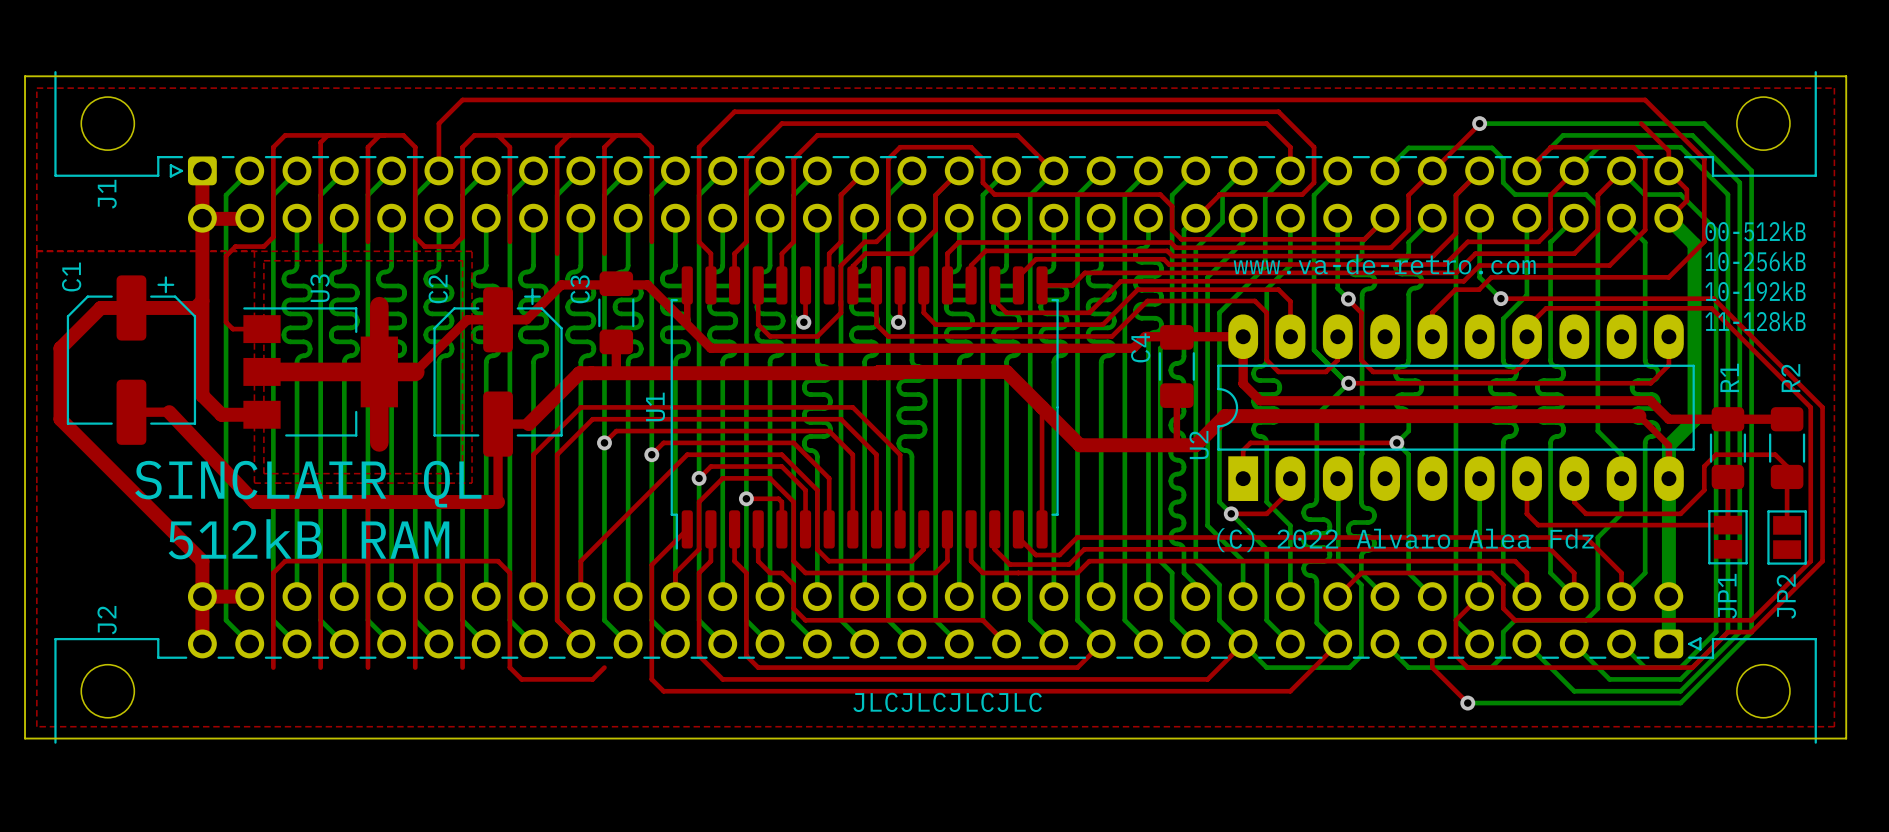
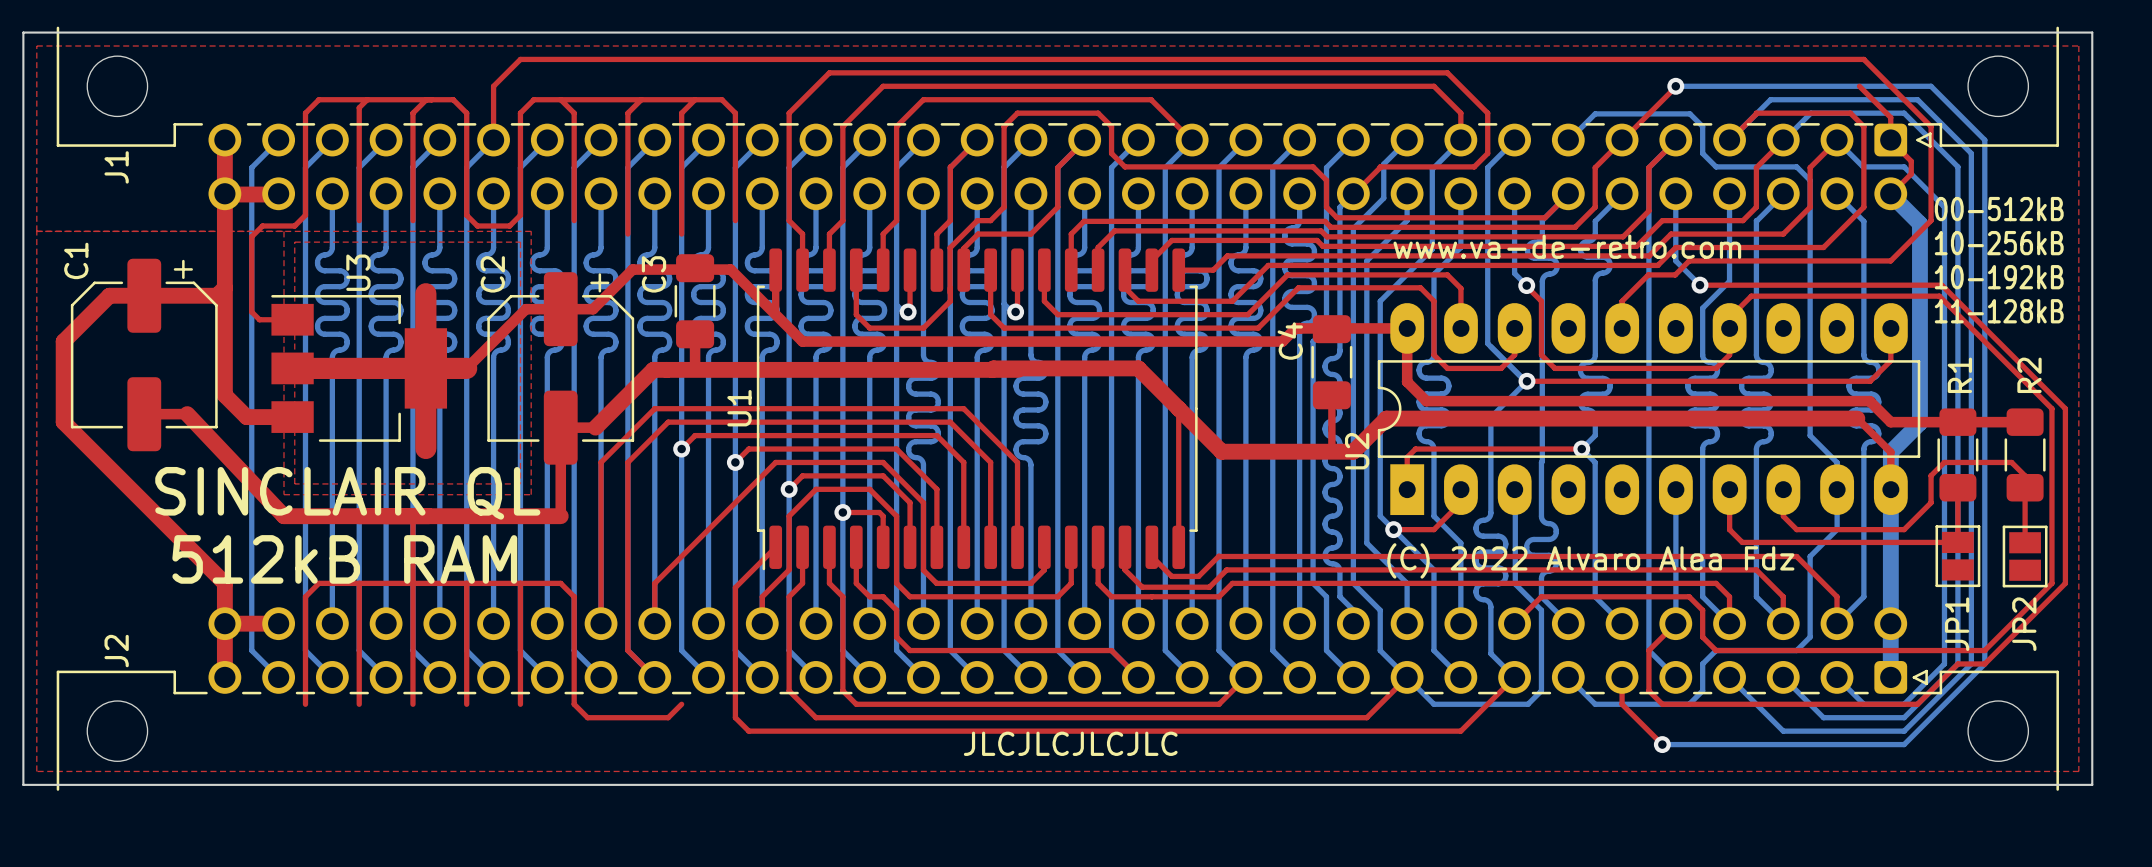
J1 footprint: [54, 71, 1817, 233] -> [56, 26, 2059, 211]

